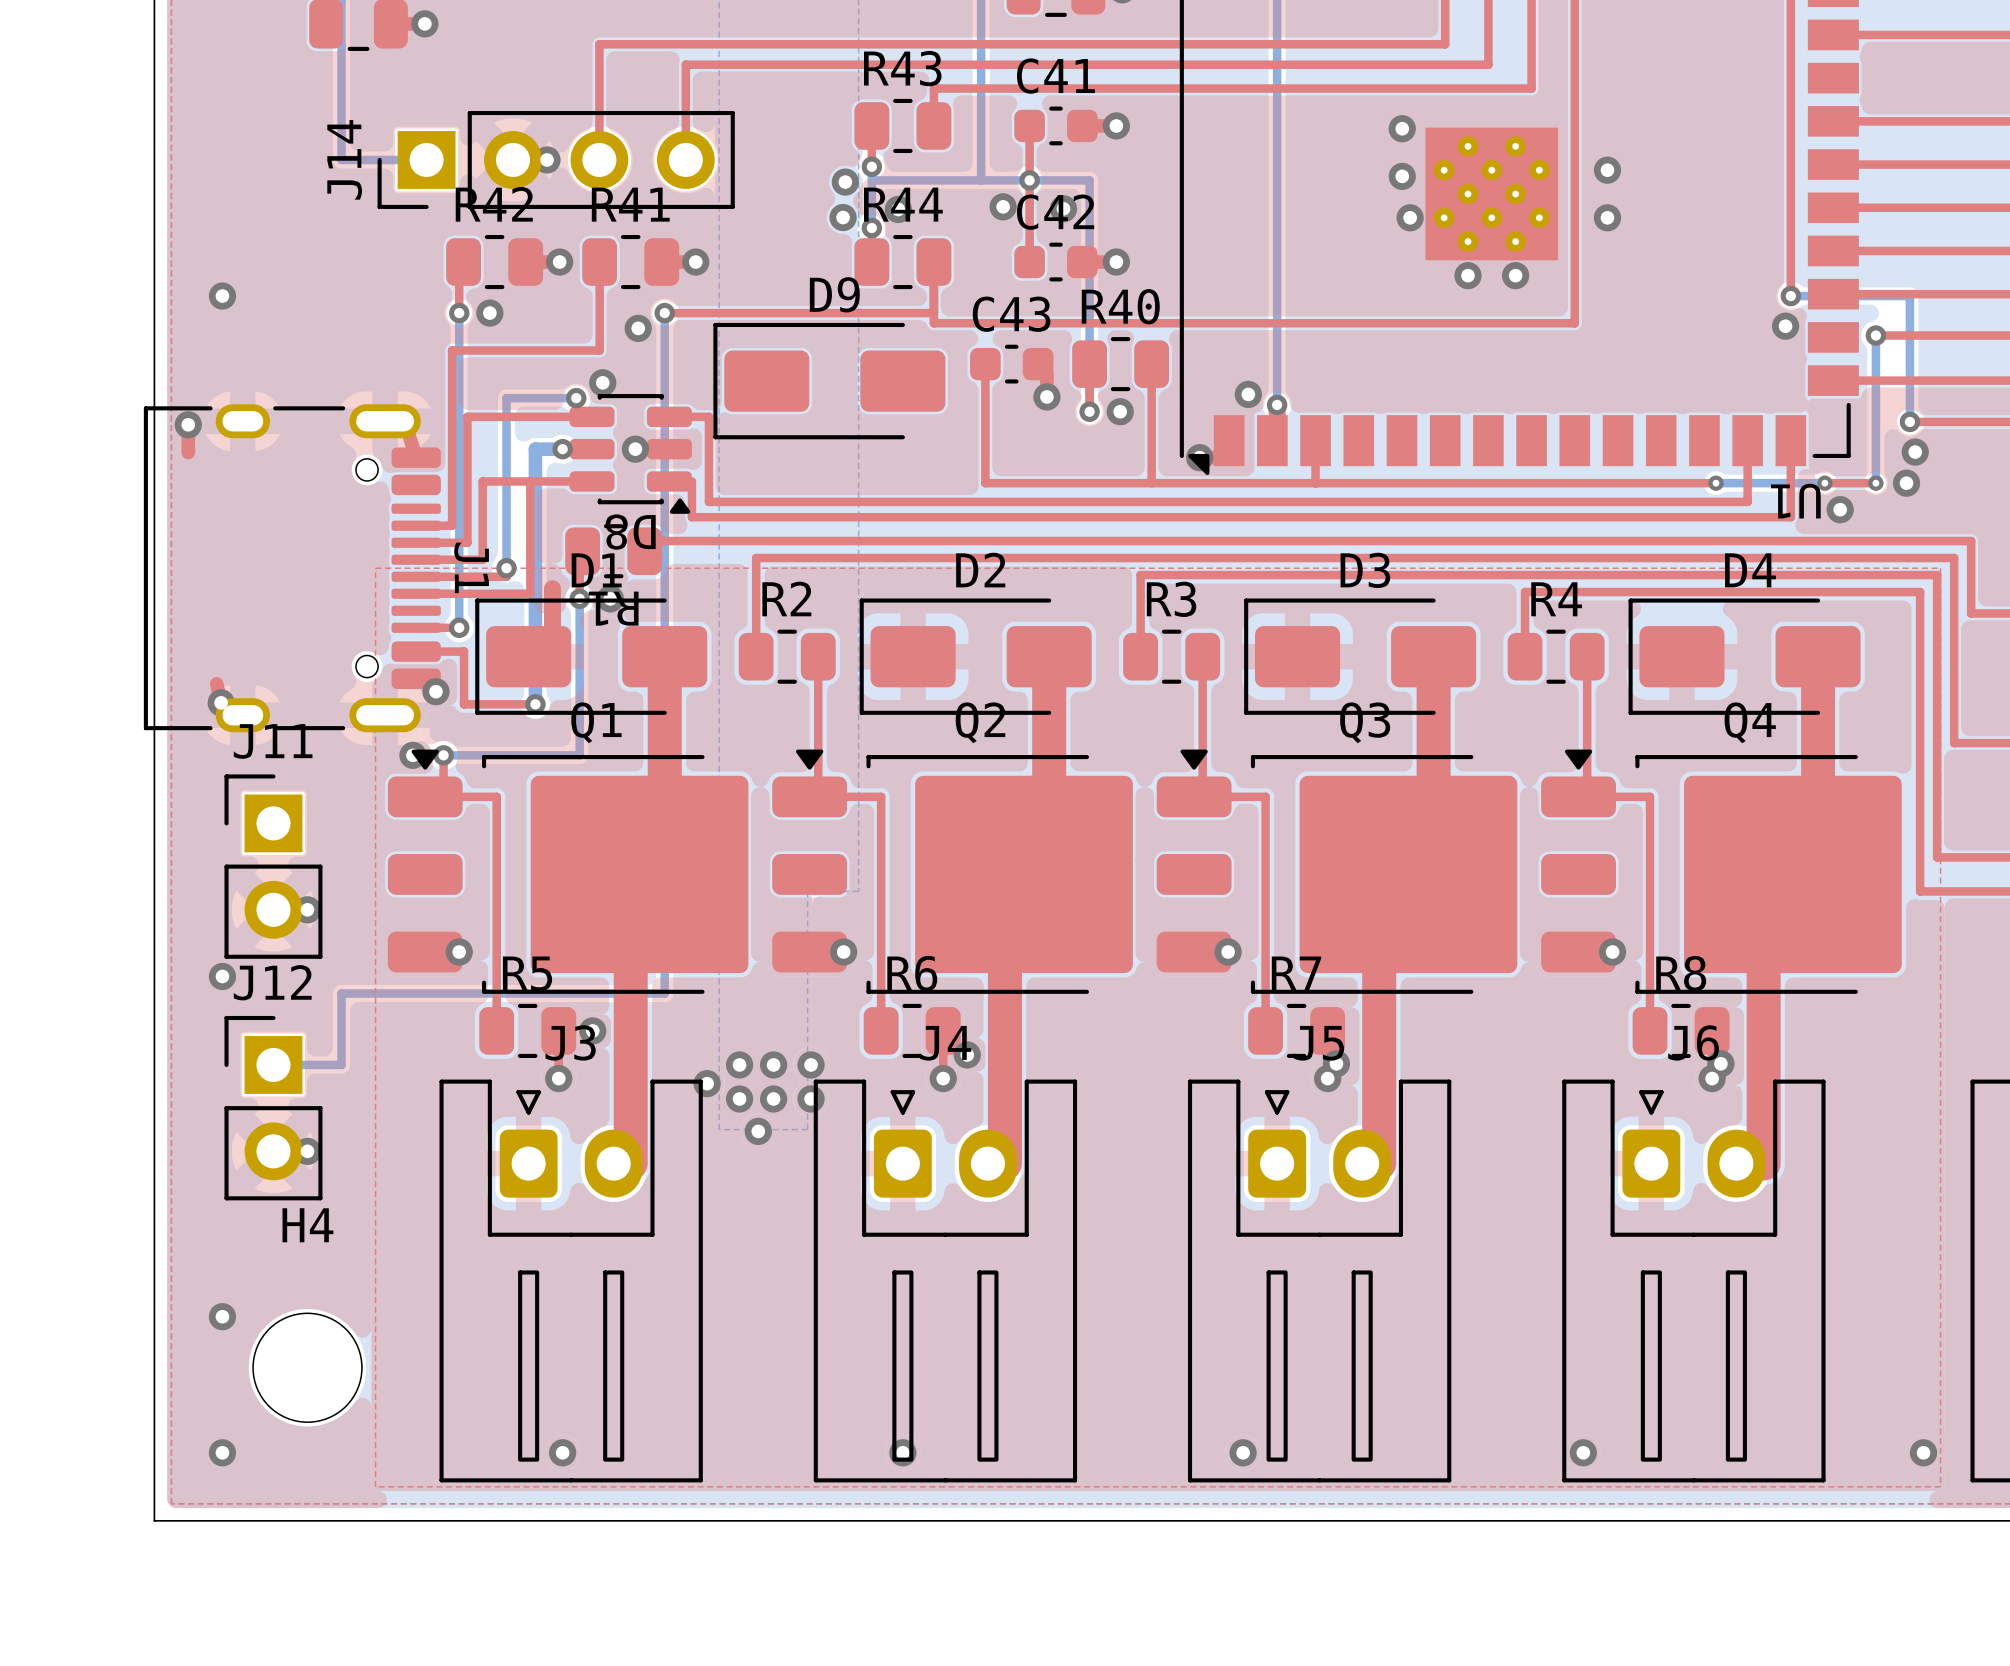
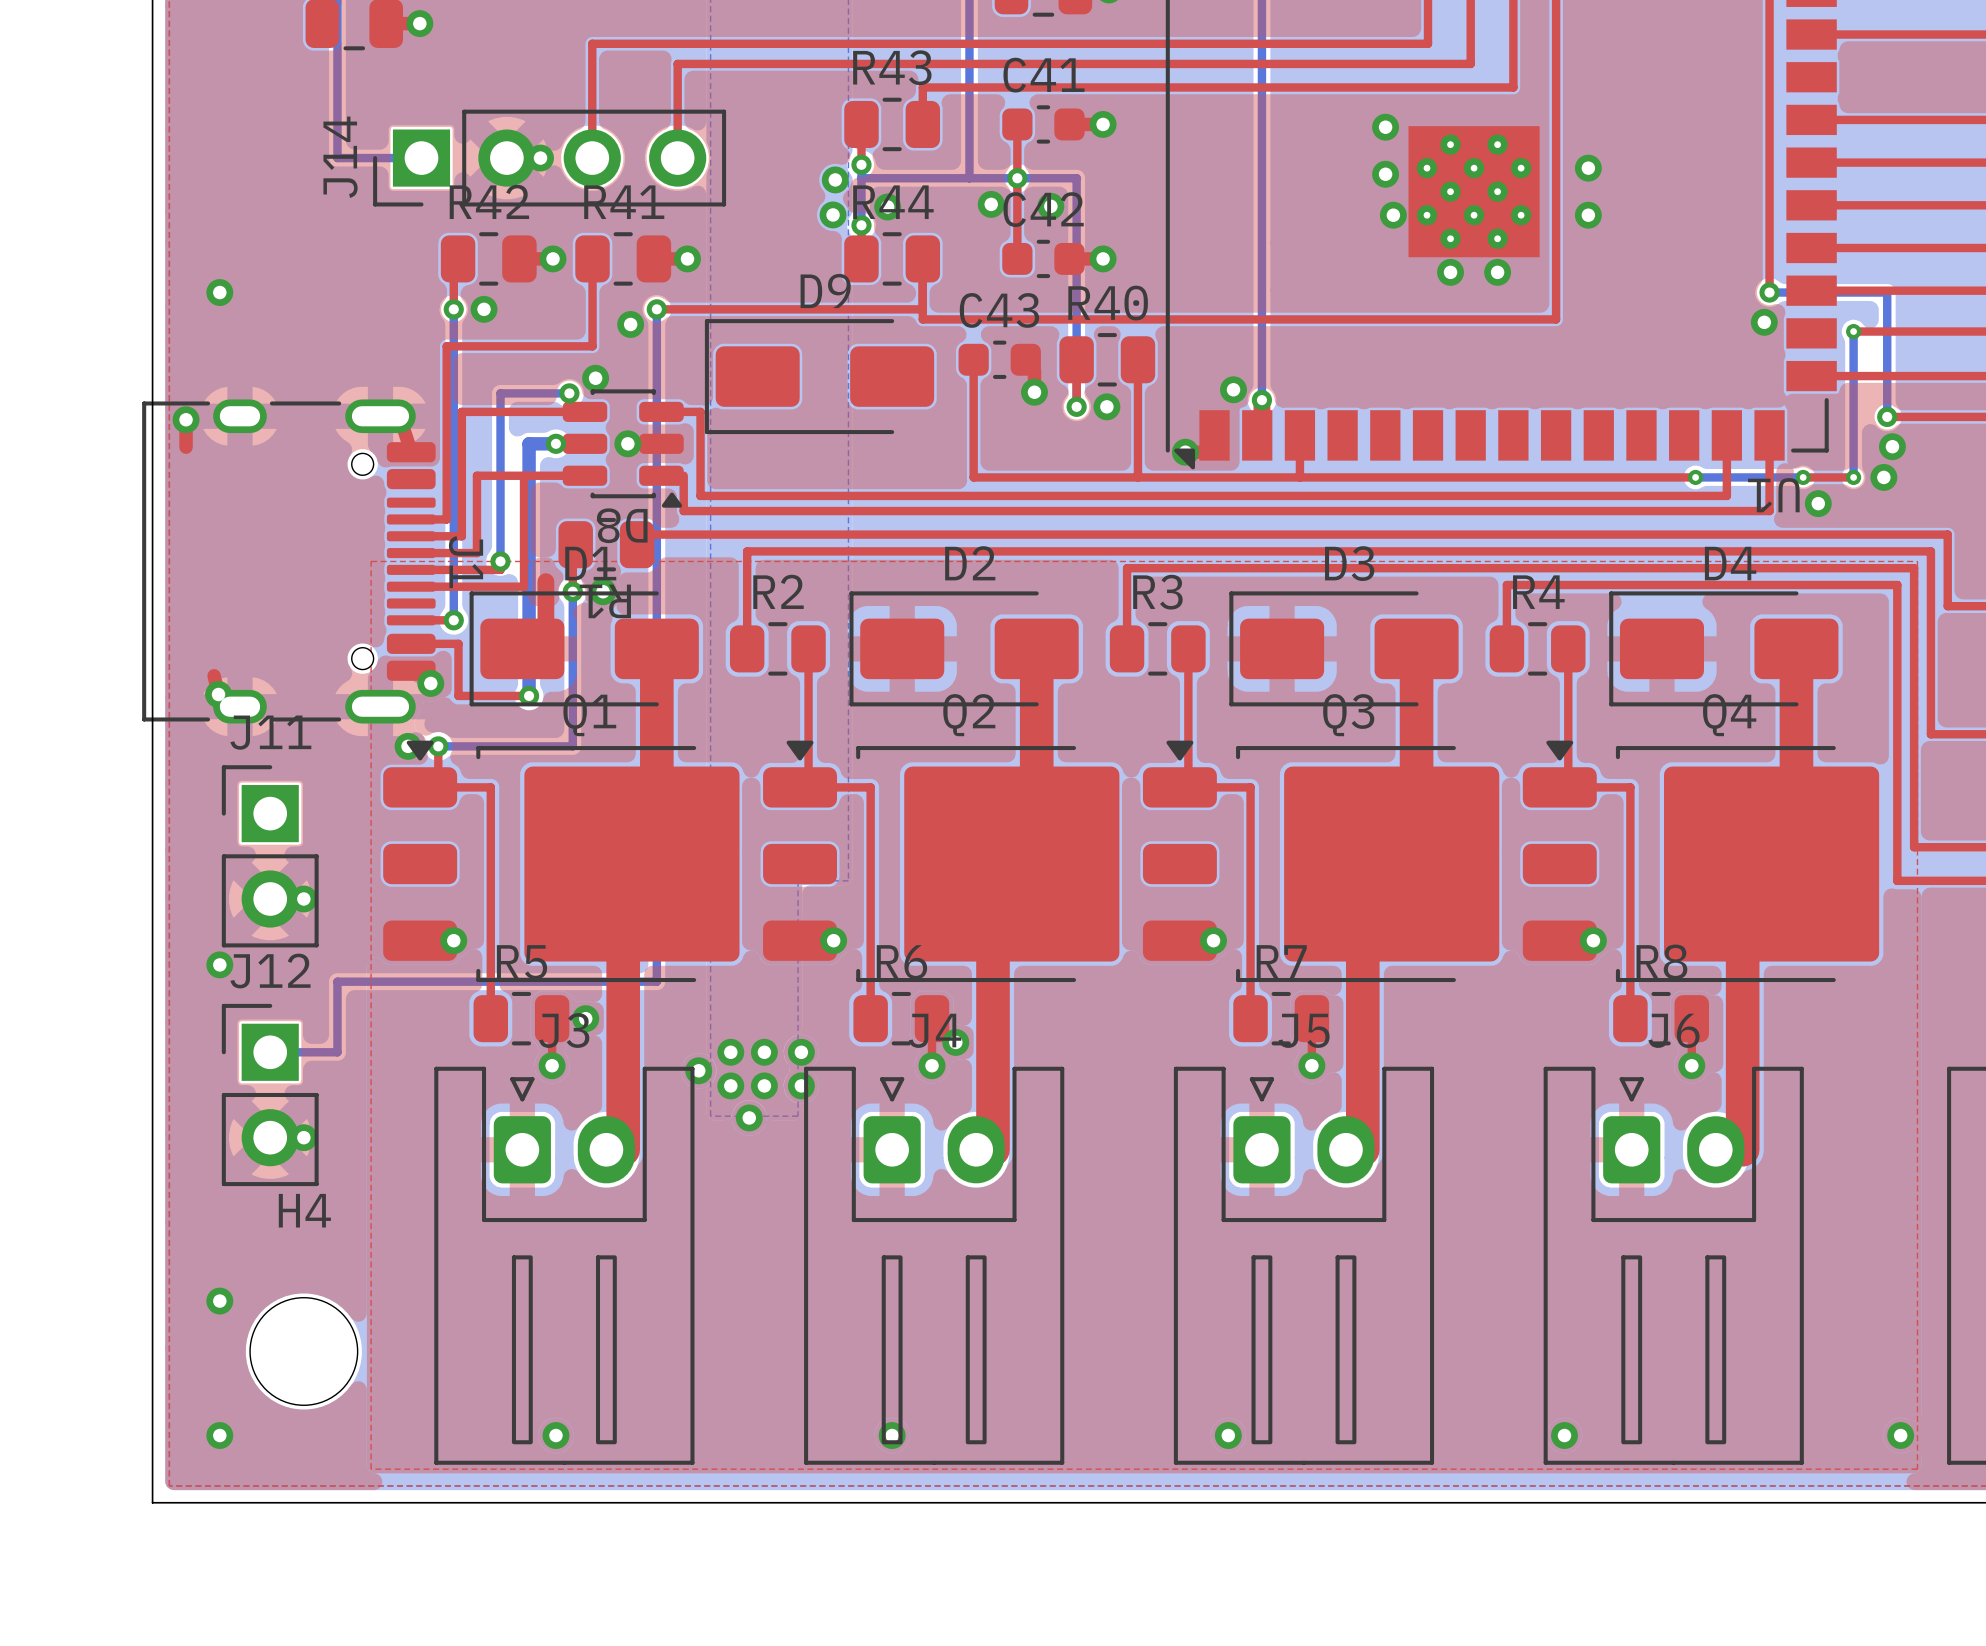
via: (1875, 335) -> none
via: (1336, 1063) -> none
via: (1720, 1063) -> none

